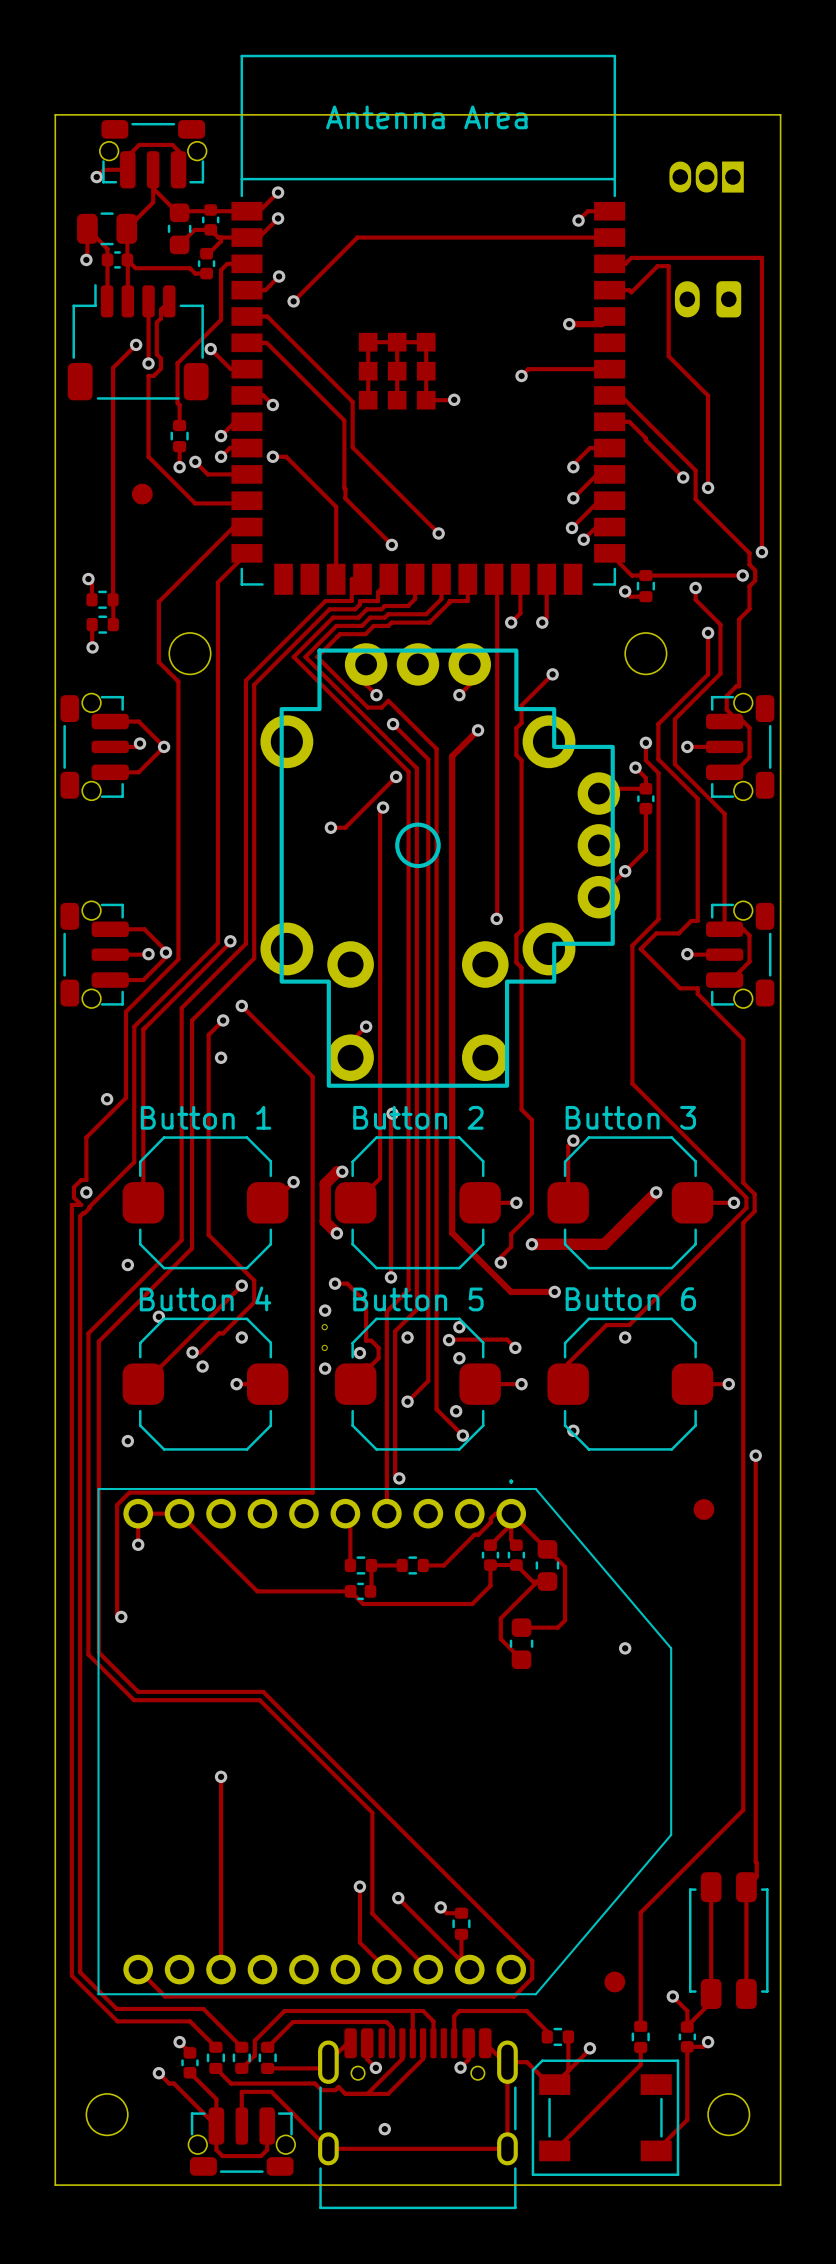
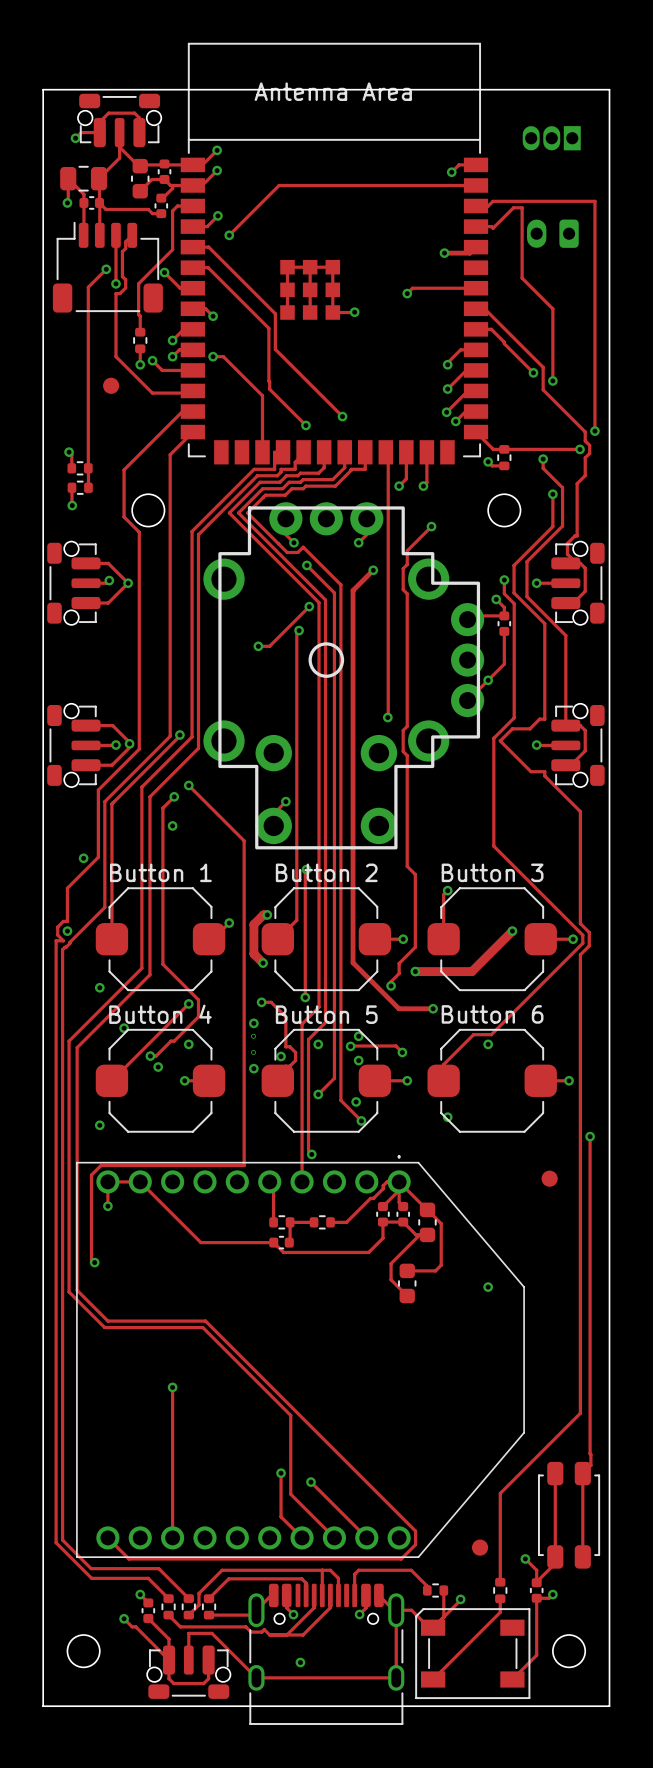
track: (440, 1907) (446, 1913) (461, 1913) -> none
via: (440, 1907) -> none
part: (461, 1923) -> none
track: (461, 1934) (461, 1961) -> none

